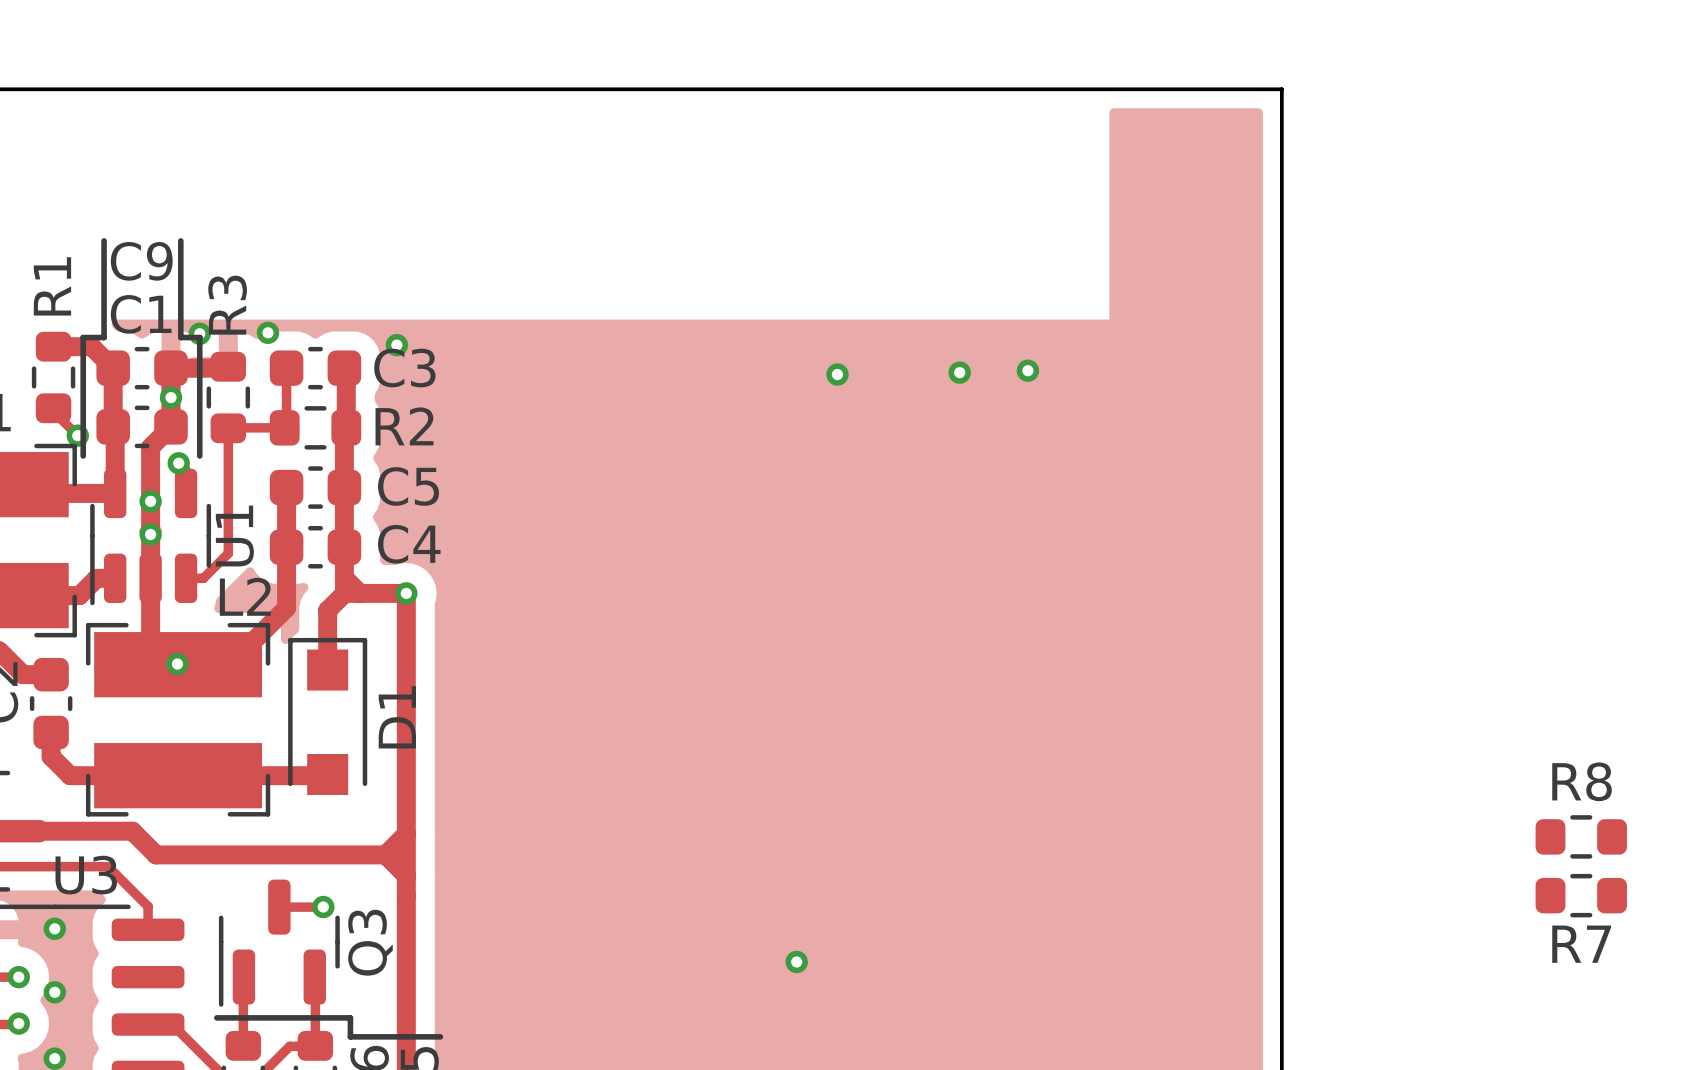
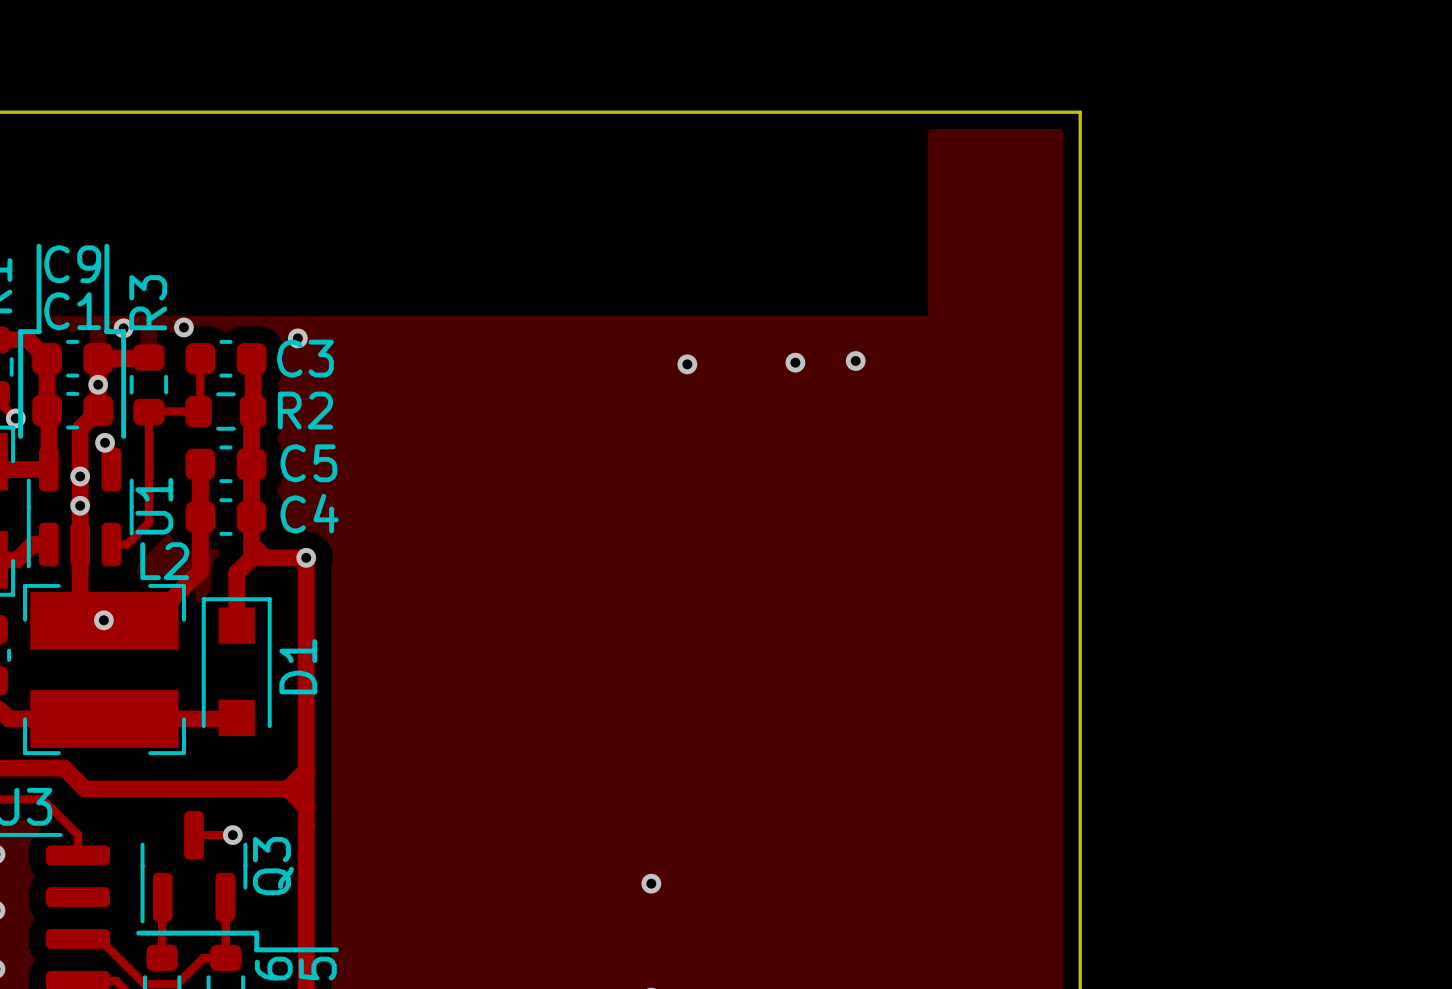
R8: (1581, 836) -> none
R7: (1581, 895) -> none

